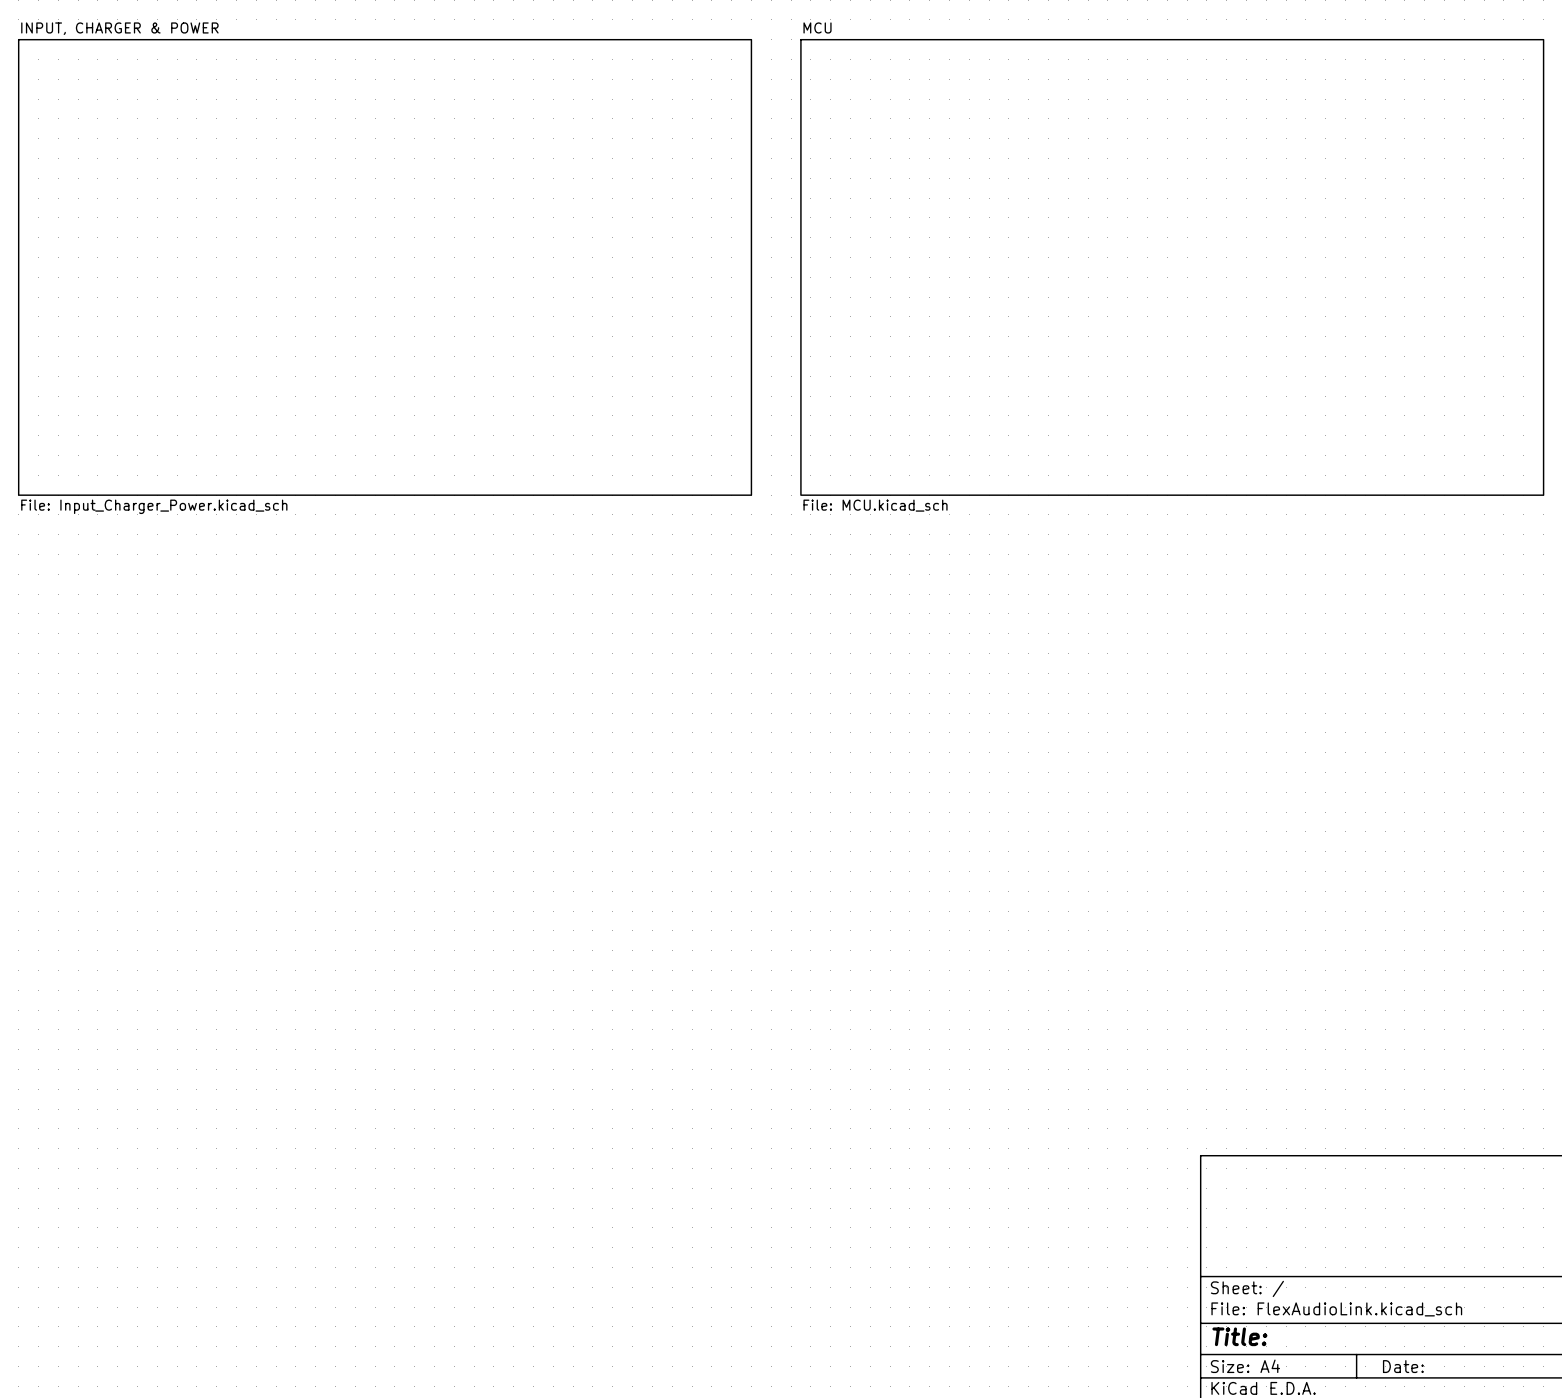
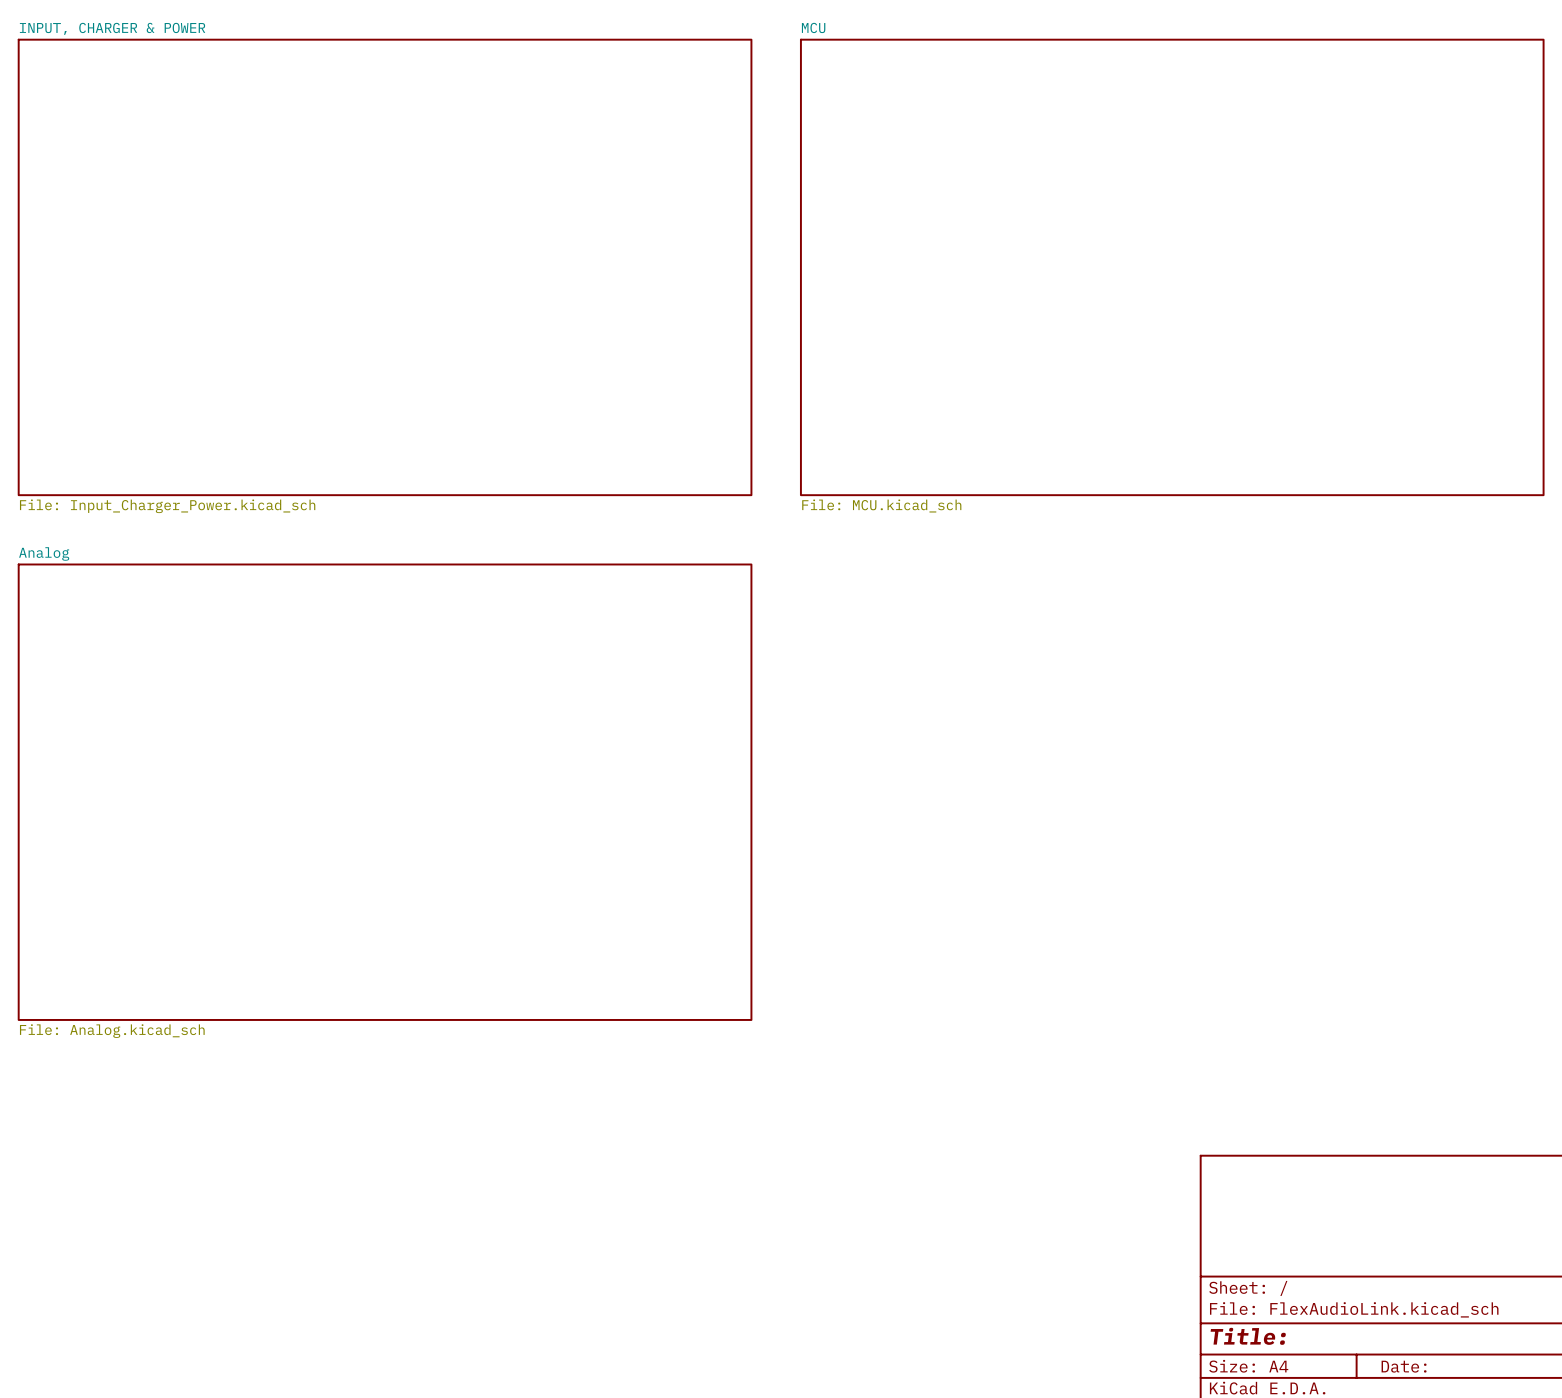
sheet Analog: none -> File: Analog.kicad_sch (385, 792)

